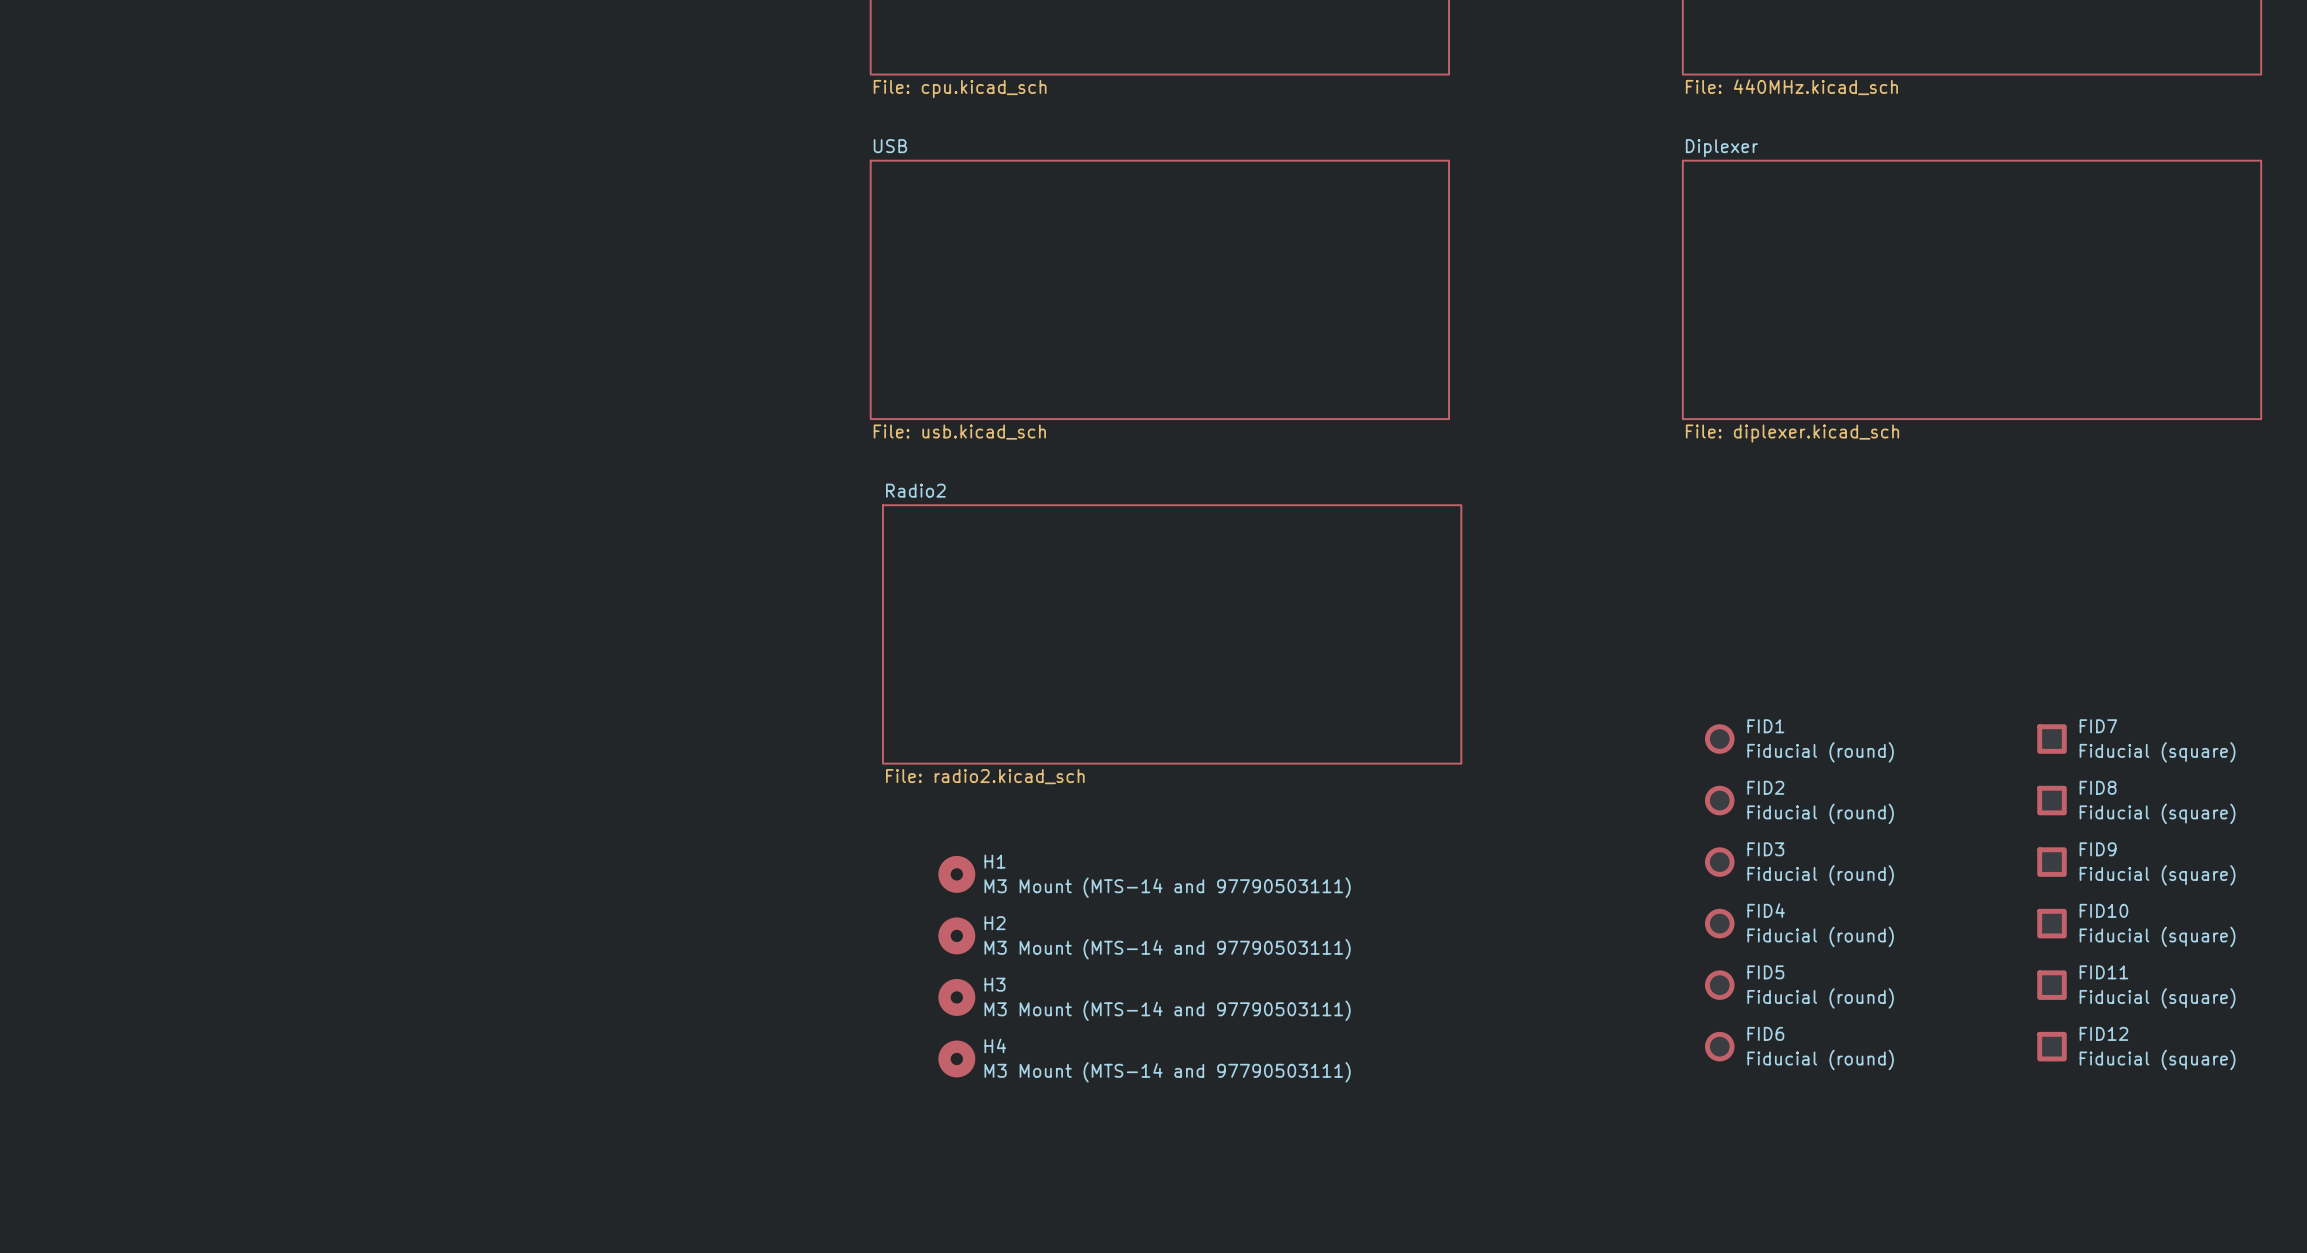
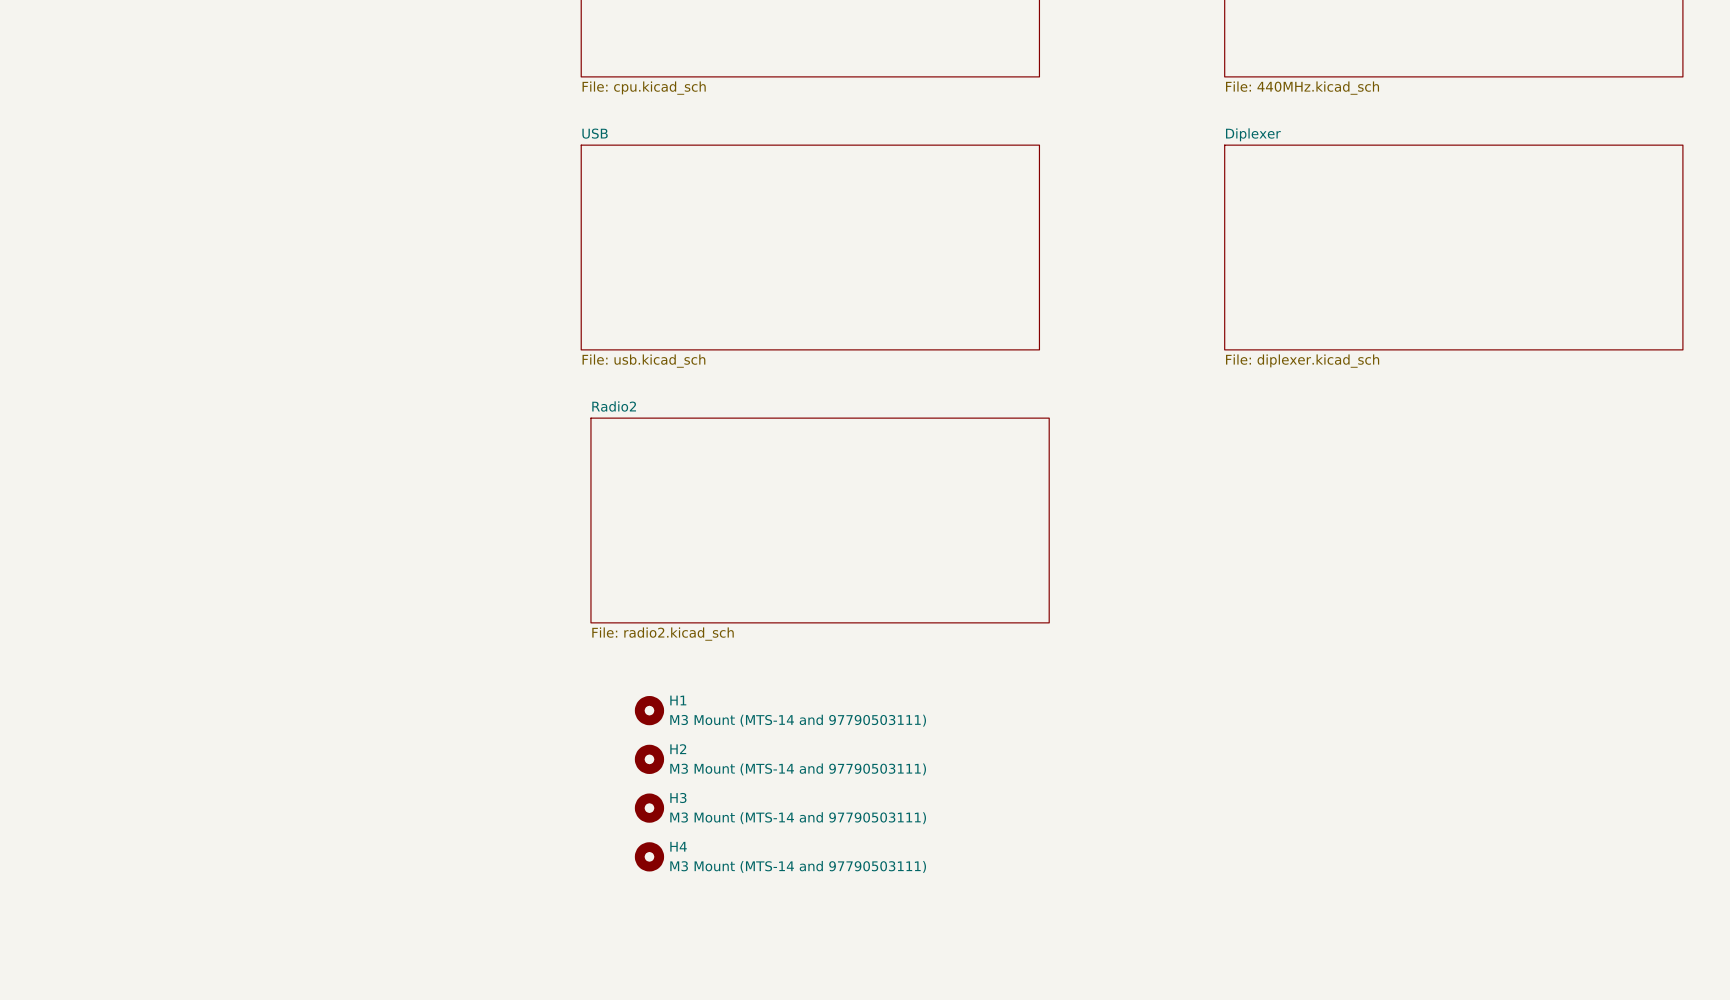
FID1: Fiducial (round) (1719, 739) -> none
FID7: Fiducial (square) (2051, 739) -> none
FID2: Fiducial (round) (1719, 800) -> none
FID8: Fiducial (square) (2051, 800) -> none
FID3: Fiducial (round) (1719, 862) -> none
FID9: Fiducial (square) (2051, 862) -> none
FID4: Fiducial (round) (1719, 923) -> none
FID10: Fiducial (square) (2051, 923) -> none
FID5: Fiducial (round) (1719, 985) -> none
FID11: Fiducial (square) (2051, 985) -> none
FID6: Fiducial (round) (1719, 1046) -> none
FID12: Fiducial (square) (2051, 1046) -> none

